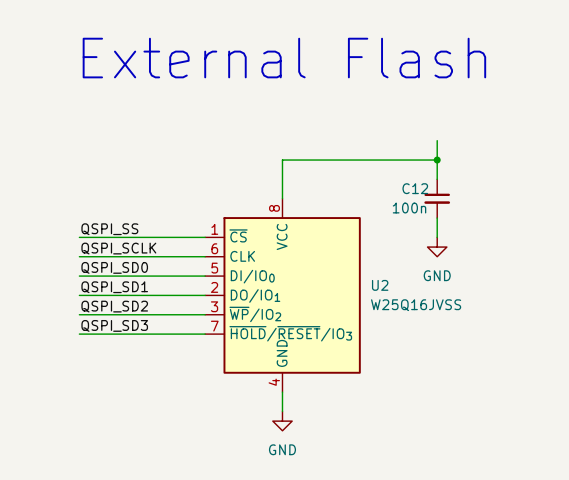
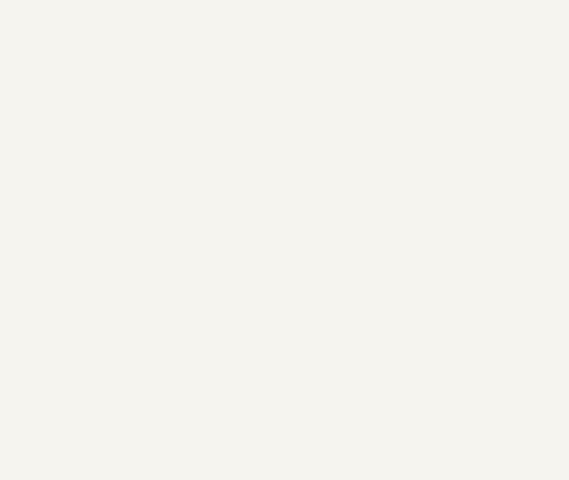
text: External Flash (284, 58) -> none
wire: (437, 140) (437, 179) -> none
wire: (437, 160) (282, 160) (282, 198) -> none
junction: (437, 160) -> none
C12: 100n (437, 198) -> none
wire: (437, 218) (437, 237) -> none
label: QSPI_SS (109, 229) -> none
wire: (79, 237) (205, 237) -> none
power symbol: GND (437, 247) -> none
label: QSPI_SCLK (118, 248) -> none
wire: (79, 256) (205, 256) -> none
label: QSPI_SD0 (114, 267) -> none
wire: (79, 276) (205, 276) -> none
label: QSPI_SD1 (114, 287) -> none
wire: (79, 295) (205, 295) -> none
U2: W25Q16JVSS (282, 295) -> none
label: QSPI_SD2 (114, 306) -> none
wire: (79, 314) (205, 314) -> none
label: QSPI_SD3 (114, 325) -> none
wire: (79, 334) (205, 334) -> none
wire: (282, 392) (282, 411) -> none
power symbol: GND (282, 421) -> none

